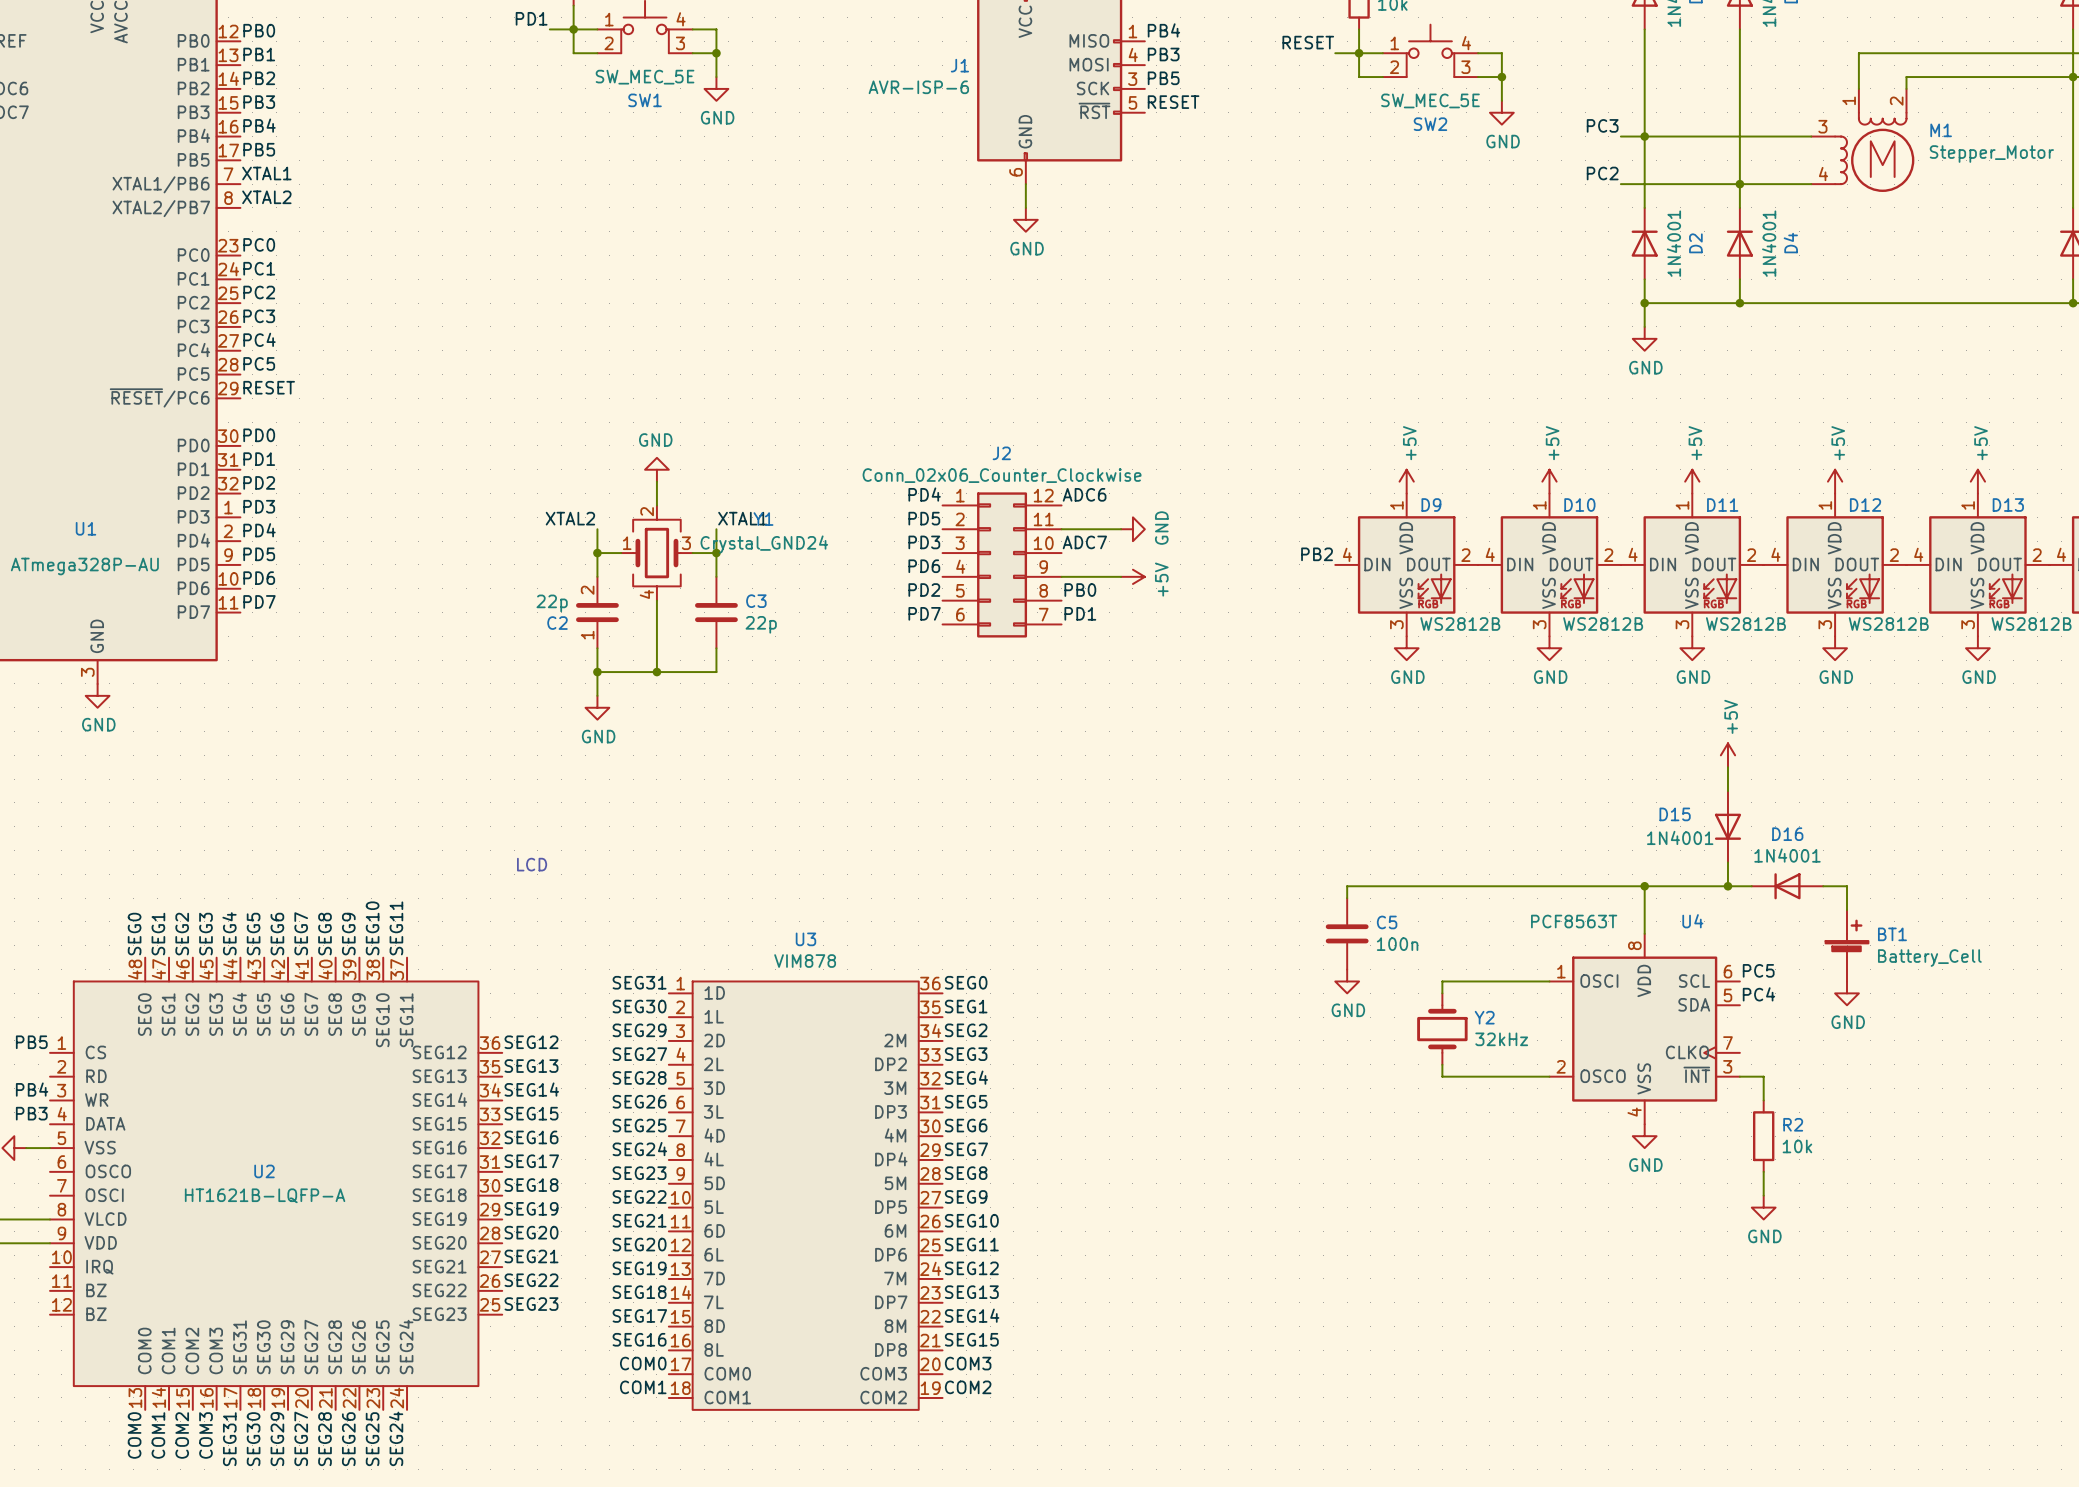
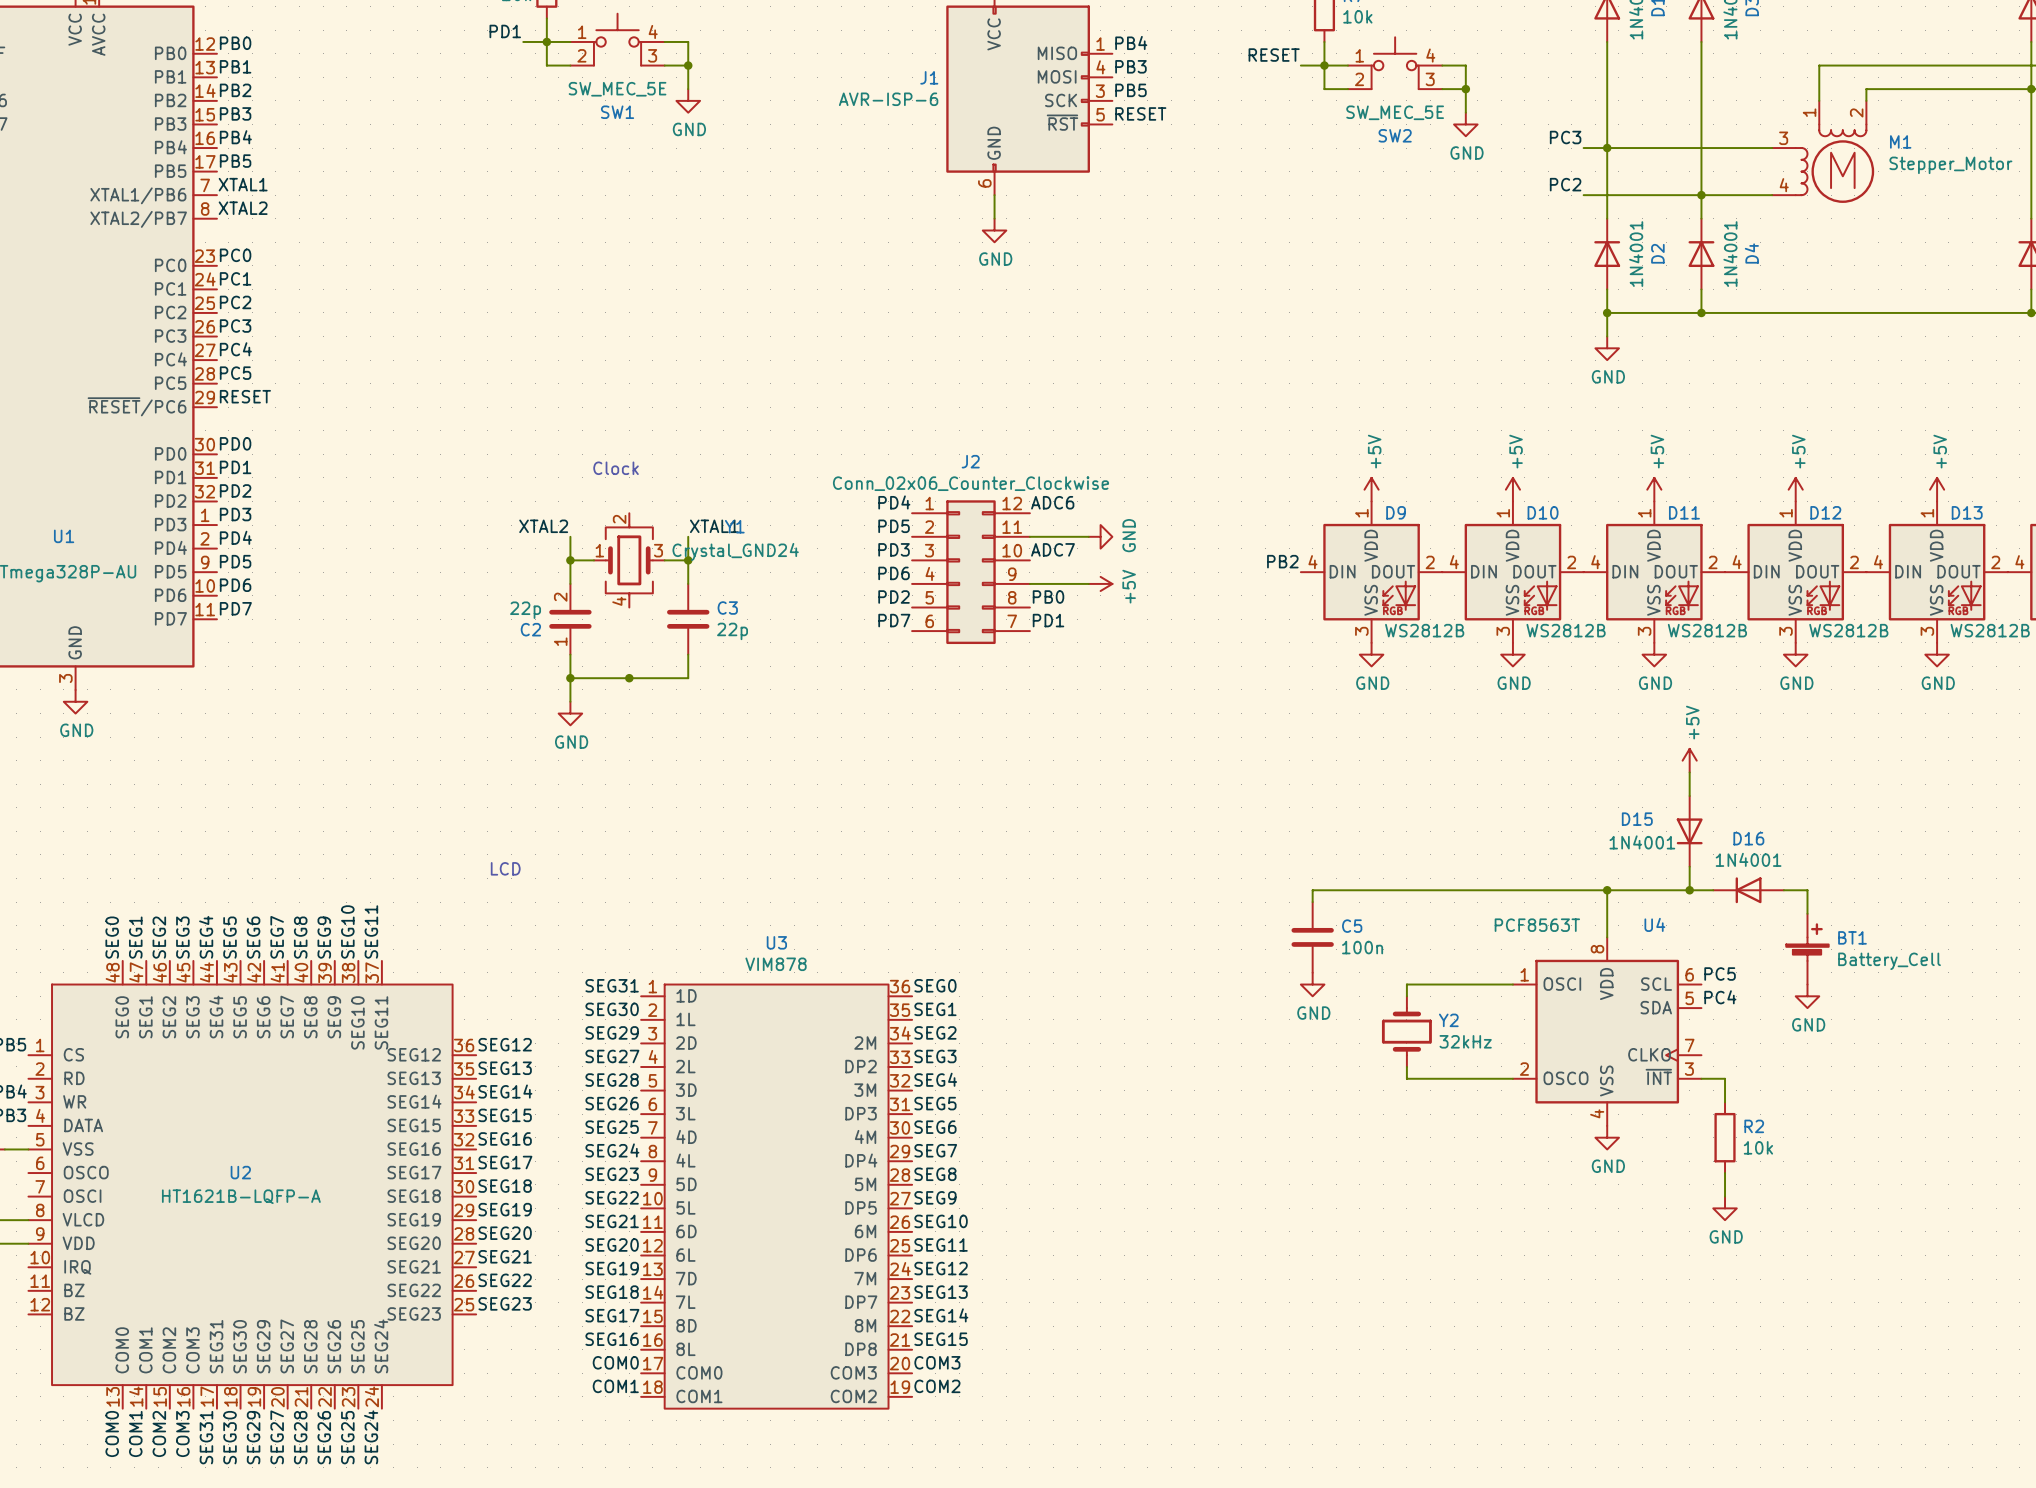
text: none -> Clock (616, 468)
power symbol: GND (656, 469) -> none
wire: (656, 481) (656, 505) -> none
wire: (656, 600) (656, 672) -> none

